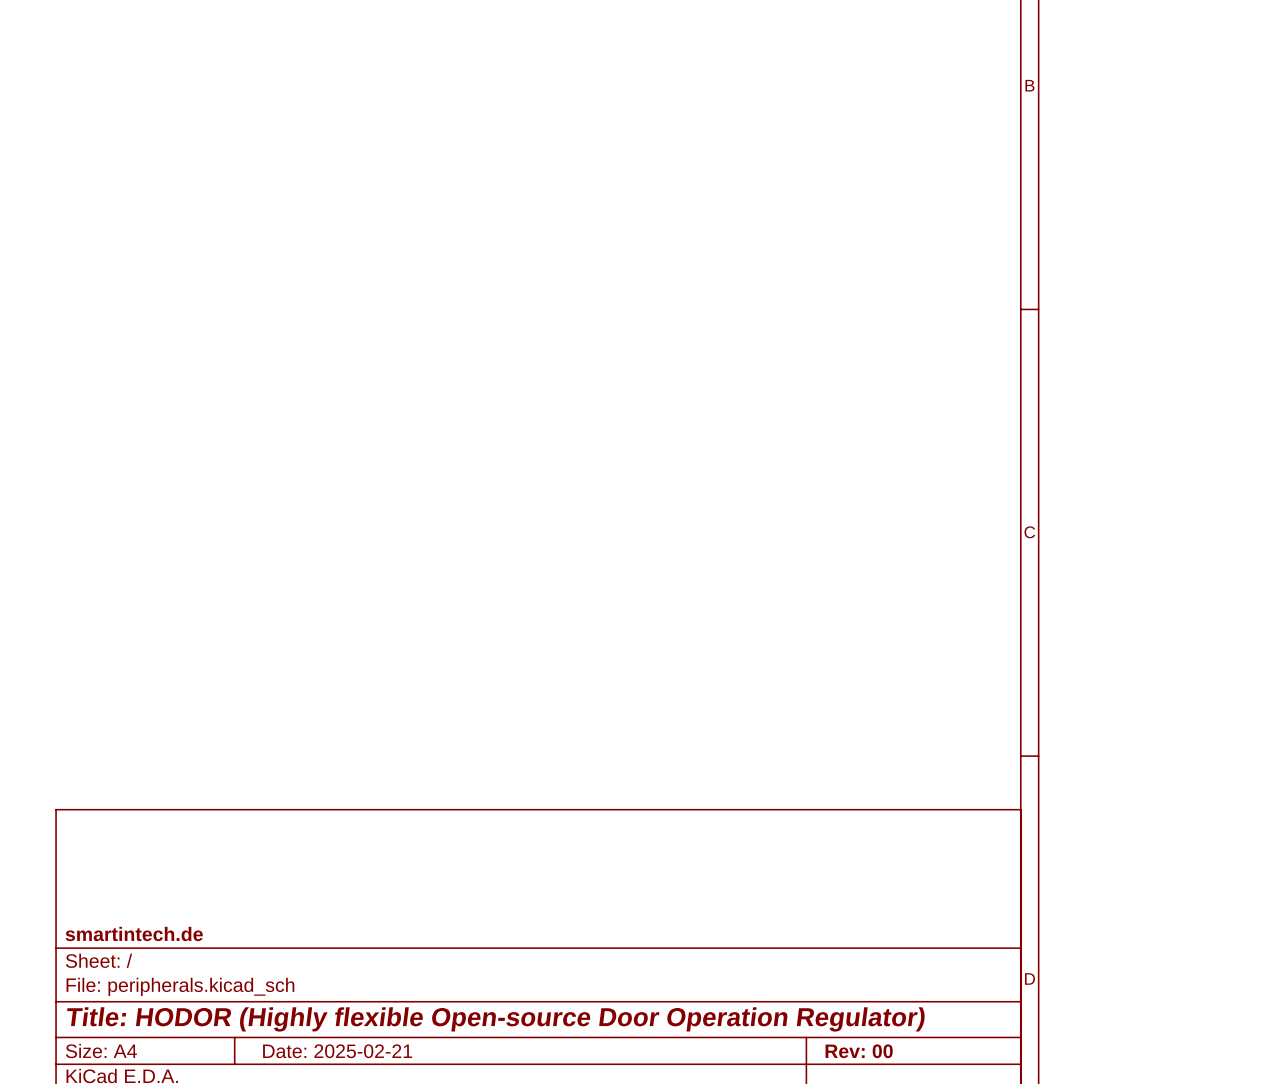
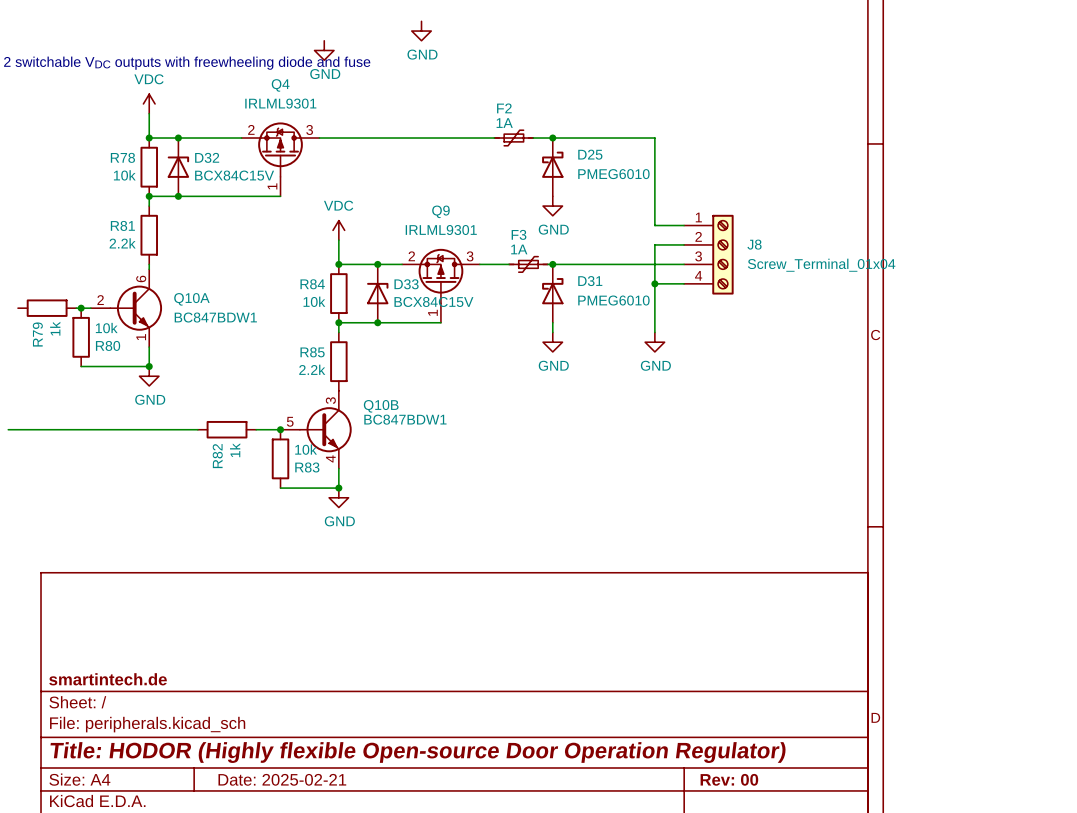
power symbol: none -> GND (421, 31)
power symbol: none -> GND (324, 50)
text: none -> 2 switchable VDC outputs with freewheeling diode and fuse (187, 63)
power symbol: none -> VDC (149, 103)
wire: none -> (149, 113) (149, 138) (241, 138)
junction: none -> (149, 138)
junction: none -> (178, 138)
wire: none -> (319, 138) (494, 138)
F2: none -> 1A (513, 138)
wire: none -> (533, 138) (654, 138) (654, 225) (684, 225)
junction: none -> (552, 138)
Q4: none -> IRLML9301 (280, 159)
R78: none -> 10k (149, 167)
D32: none -> BCX84C15V (178, 167)
D25: none -> PMEG6010 (552, 167)
junction: none -> (149, 196)
junction: none -> (178, 196)
wire: none -> (280, 196) (149, 196) (149, 206)
power symbol: none -> GND (552, 206)
power symbol: none -> VDC (338, 230)
R81: none -> 2.2k (149, 235)
wire: none -> (338, 240) (338, 264) (402, 264)
wire: none -> (684, 244) (654, 244) (654, 332)
J8: none -> Screw_Terminal_01x04 (708, 254)
wire: none -> (149, 264) (149, 269)
junction: none -> (338, 264)
junction: none -> (377, 264)
wire: none -> (479, 264) (509, 264)
F3: none -> 1A (528, 264)
wire: none -> (547, 264) (684, 264)
junction: none -> (552, 264)
wire: none -> (654, 283) (684, 283)
junction: none -> (654, 283)
Q9: none -> IRLML9301 (440, 285)
R84: none -> 10k (338, 293)
D33: none -> BCX84C15V (377, 293)
D31: none -> PMEG6010 (552, 293)
R79: none -> 1k (47, 308)
wire: none -> (76, 308) (90, 308)
junction: none -> (81, 308)
Q10A: none -> BC847BDW1 (126, 308)
junction: none -> (338, 322)
junction: none -> (377, 322)
wire: none -> (440, 322) (338, 322) (338, 332)
wire: none -> (552, 322) (552, 332)
R80: none -> 10k (81, 337)
power symbol: none -> GND (552, 342)
power symbol: none -> GND (654, 342)
wire: none -> (149, 347) (149, 366) (81, 366)
R85: none -> 2.2k (338, 361)
junction: none -> (149, 366)
power symbol: none -> GND (149, 376)
wire: none -> (8, 429) (197, 429)
R82: none -> 1k (227, 429)
wire: none -> (256, 429) (280, 429)
junction: none -> (280, 429)
Q10B: none -> BC847BDW1 (316, 429)
R83: none -> 10k (280, 458)
wire: none -> (338, 468) (338, 488) (280, 488)
junction: none -> (338, 488)
power symbol: none -> GND (338, 497)

